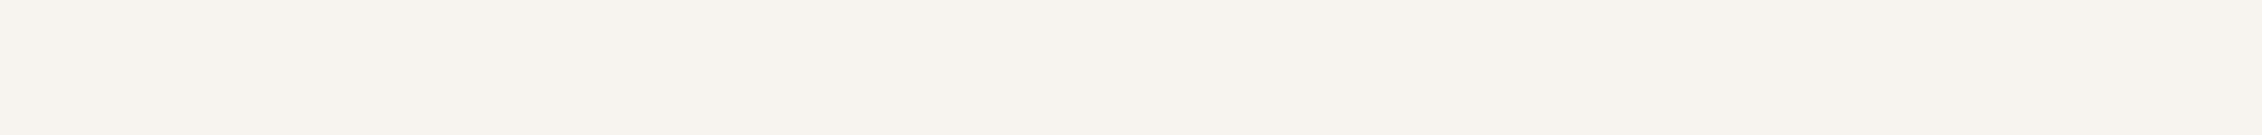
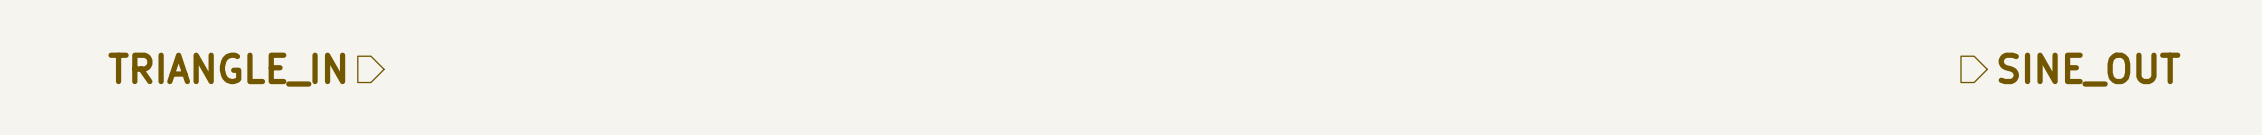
hierarchical label: none -> TRIANGLE_IN (226, 69)
hierarchical label: none -> SINE_OUT (2089, 69)

